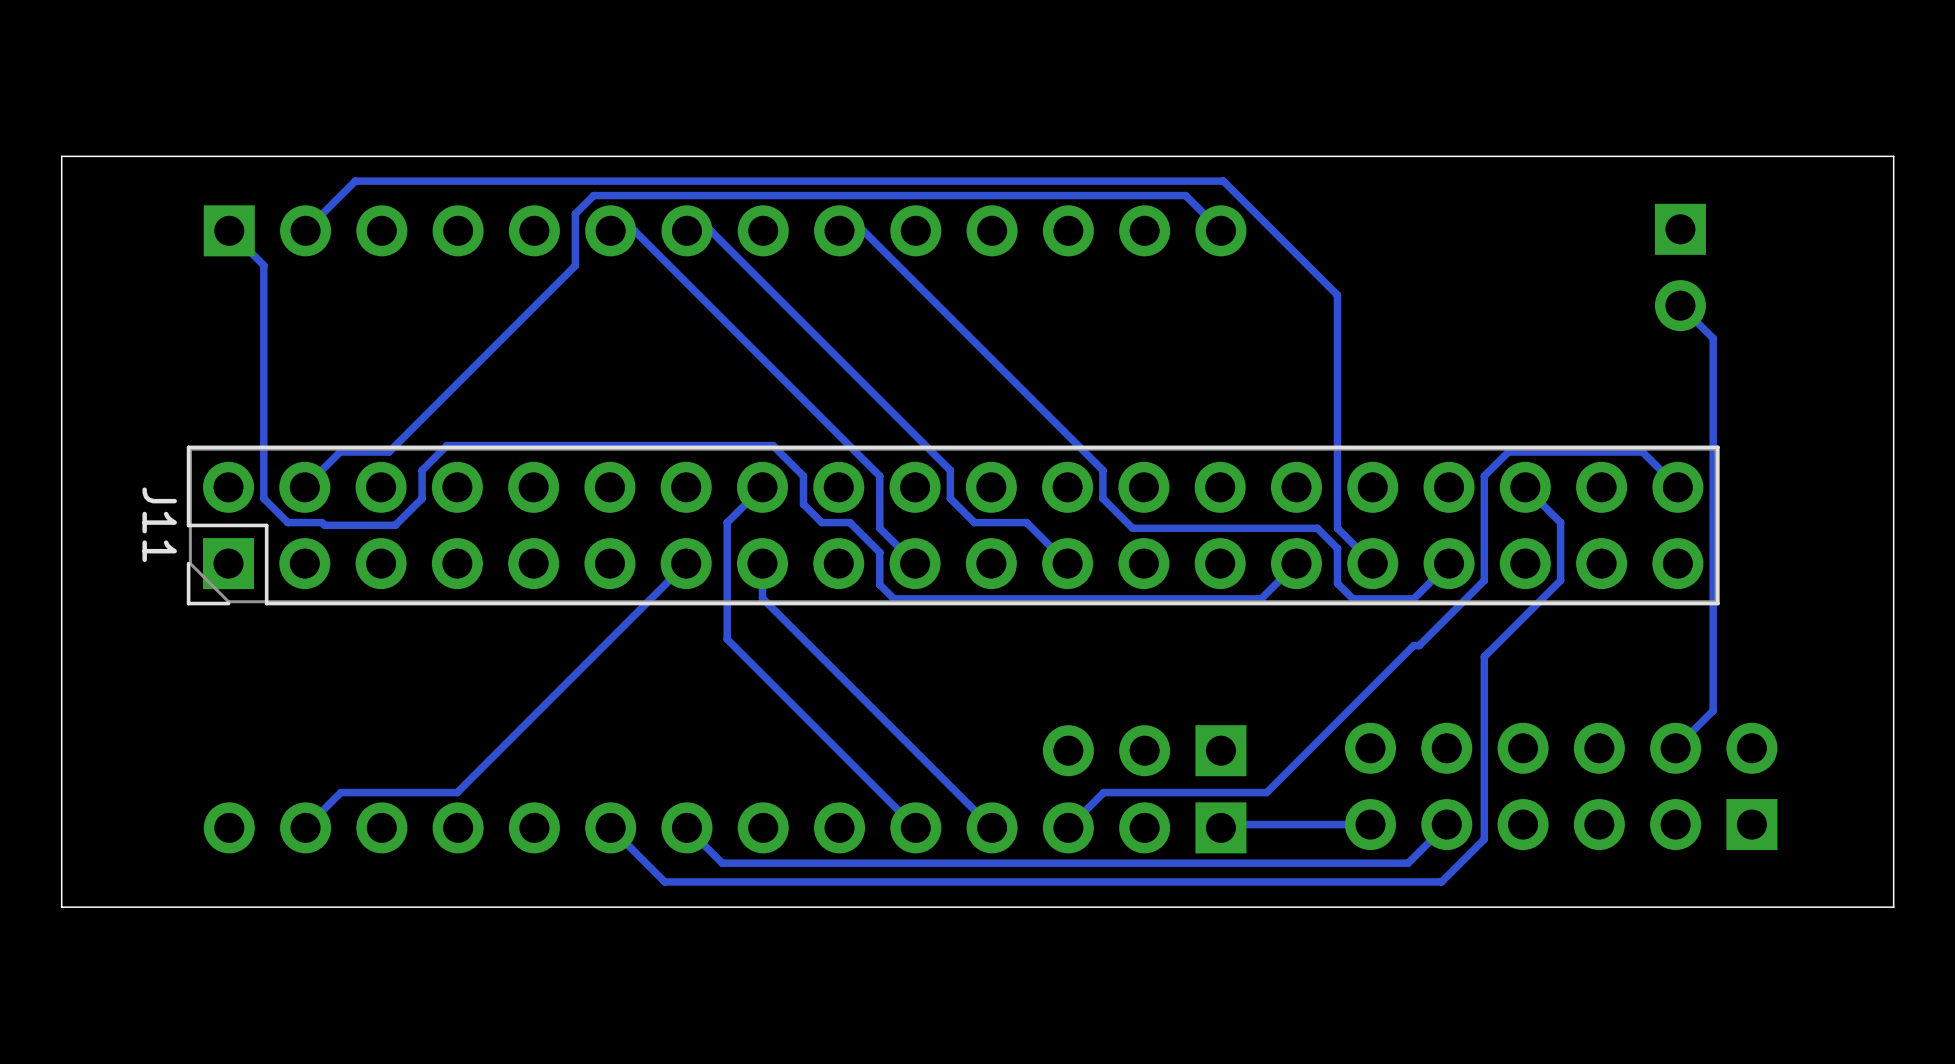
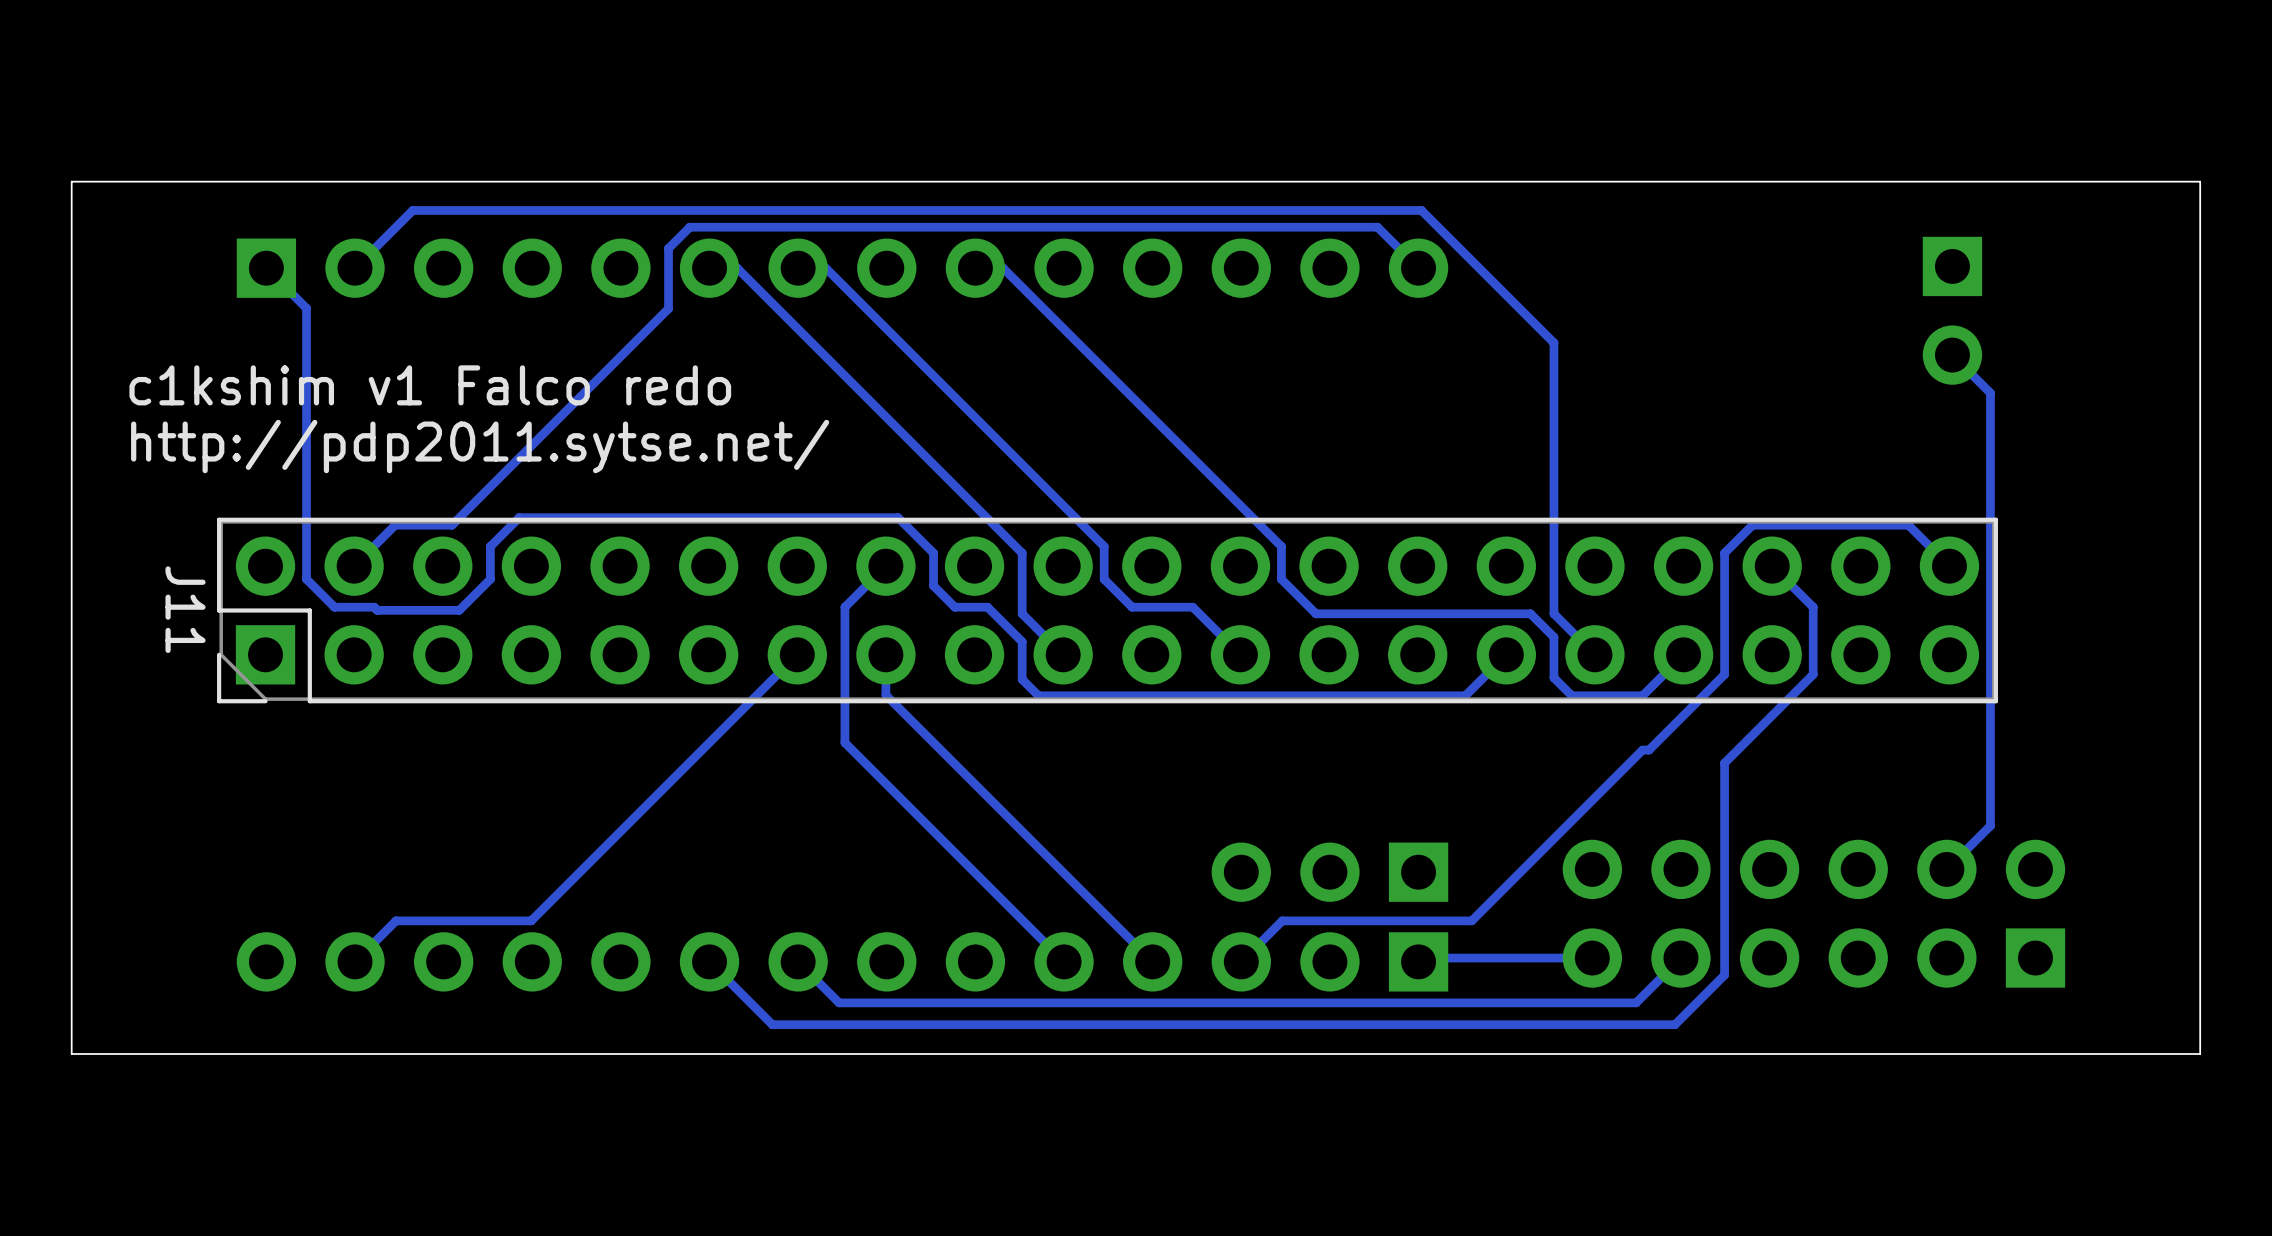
text: none -> c1kshim v1 Falco redo (430, 385)
text: none -> http://pdp2011.sytse.net/ (480, 446)

